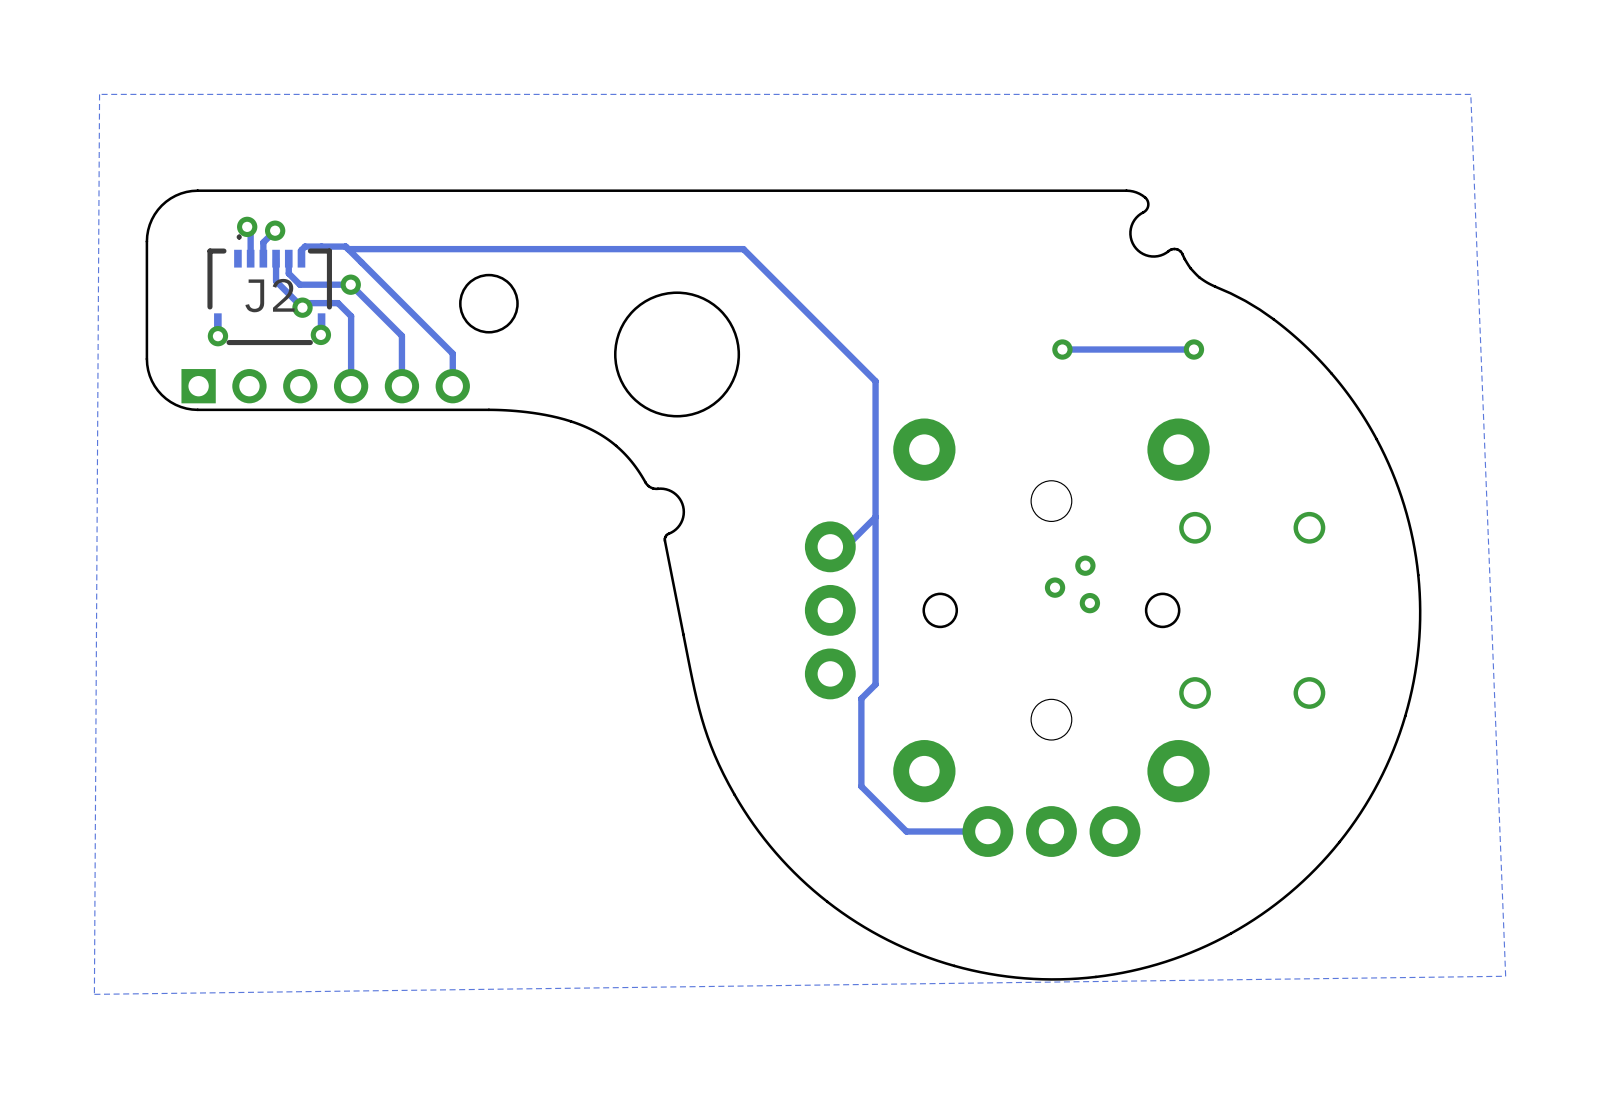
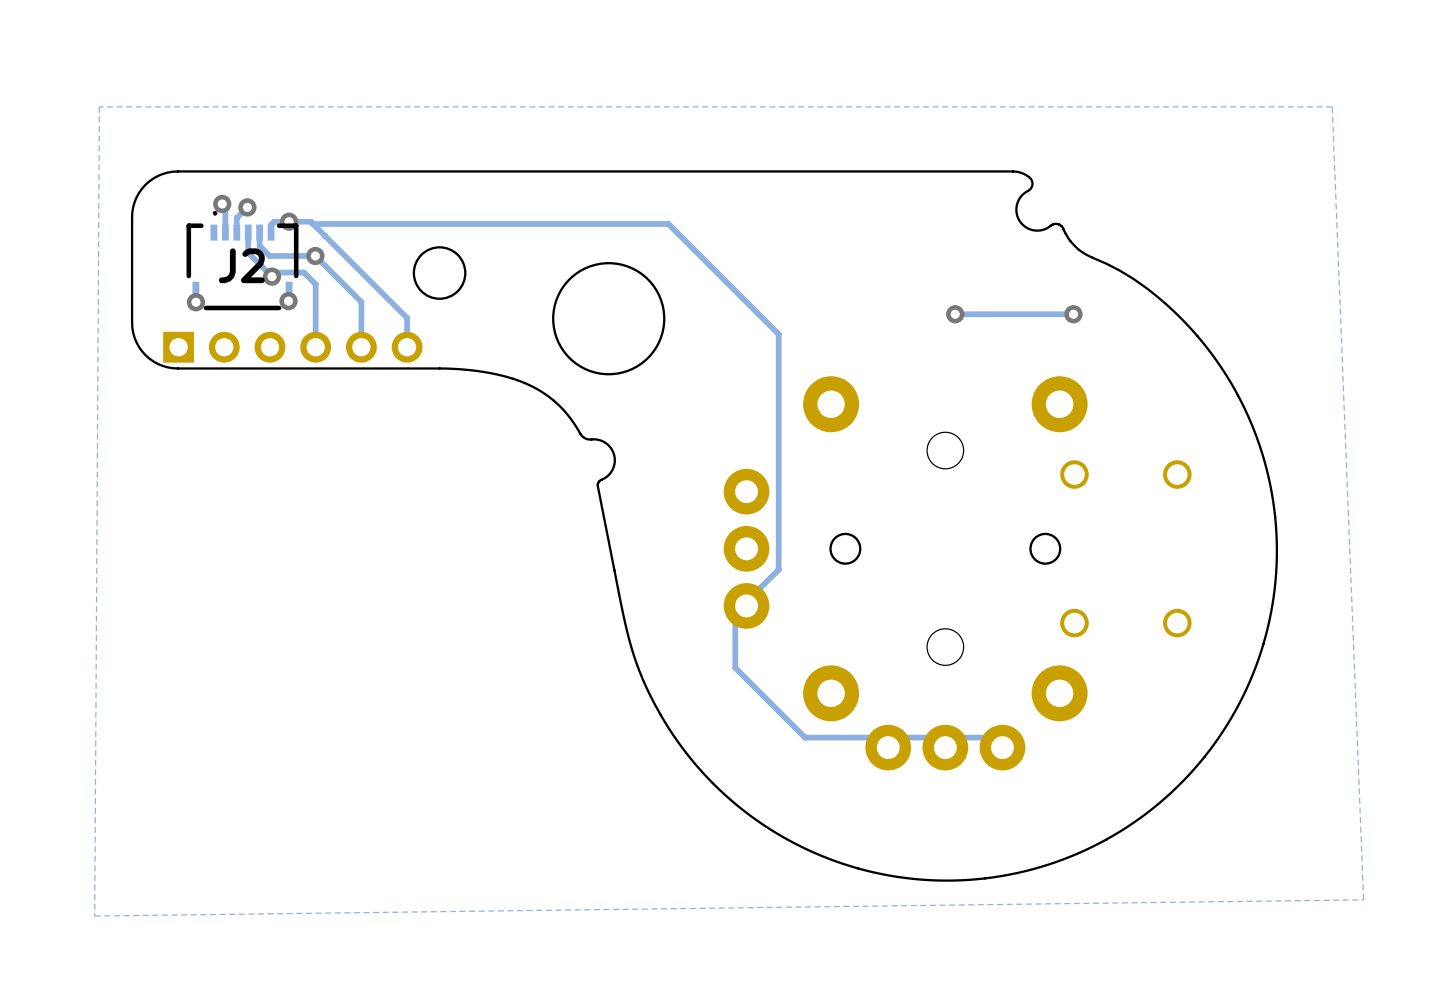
zone outline: (1470, 94) (99, 94) (94, 994) (1505, 976) (1470, 94) -> (1332, 106) (99, 106) (94, 916) (1363, 899) (1332, 106)
via: none -> (289, 221)
track: (866, 371) (875, 381) (875, 684) (861, 698) (861, 786) -> (778, 334) (778, 569) (735, 613) (735, 667) (774, 707)
track: (875, 517) (845, 546) (830, 546) -> none
via: (1085, 565) -> none
via: (1055, 587) -> none
via: (1089, 603) -> none
track: (895, 820) (906, 831) (987, 831) -> (804, 737) (986, 737) (996, 747)

